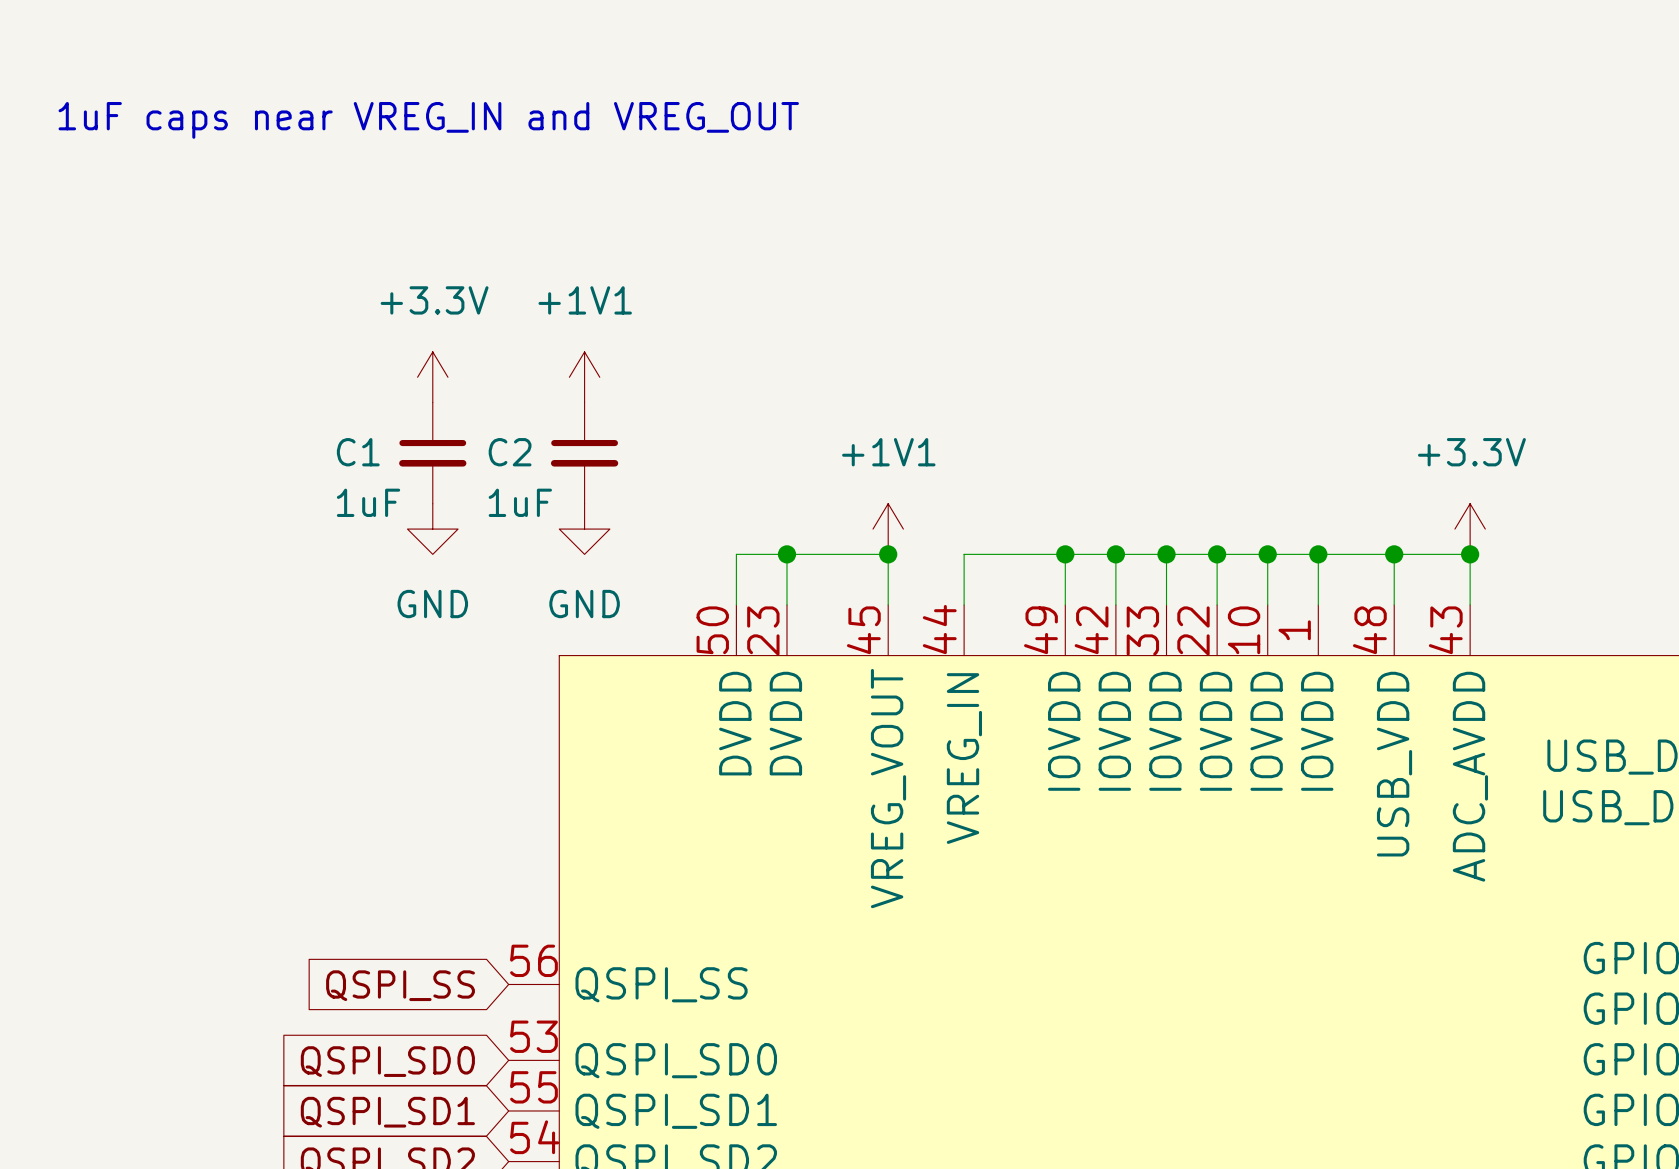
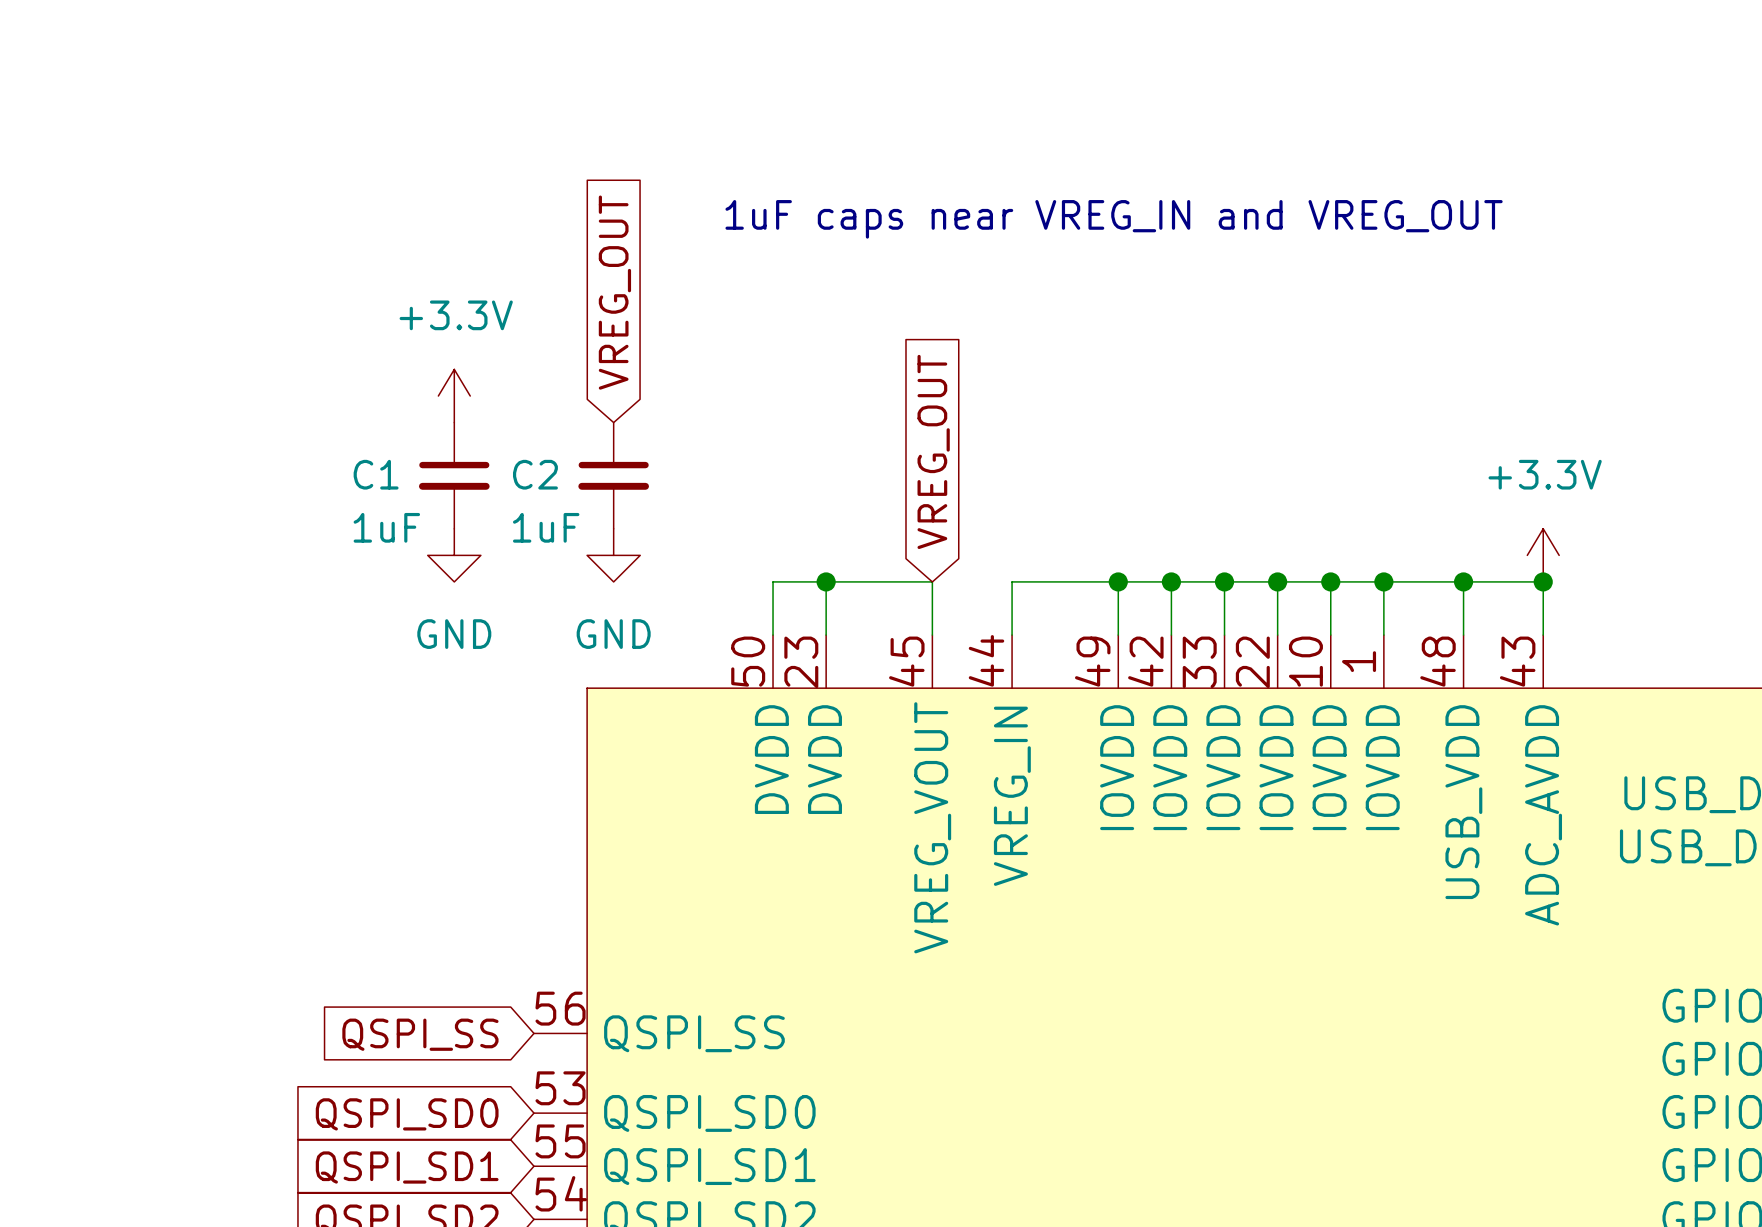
text: 1uF caps near VREG_IN and VREG_OUT (428, 120) -> none
text: none -> 1uF caps near VREG_IN and VREG_OUT (1114, 219)
global label: none -> VREG_OUT (614, 292)
power symbol: +1V1 (584, 377) -> none
global label: none -> VREG_OUT (933, 451)
power symbol: +1V1 (888, 529) -> none
junction: (888, 554) -> none

